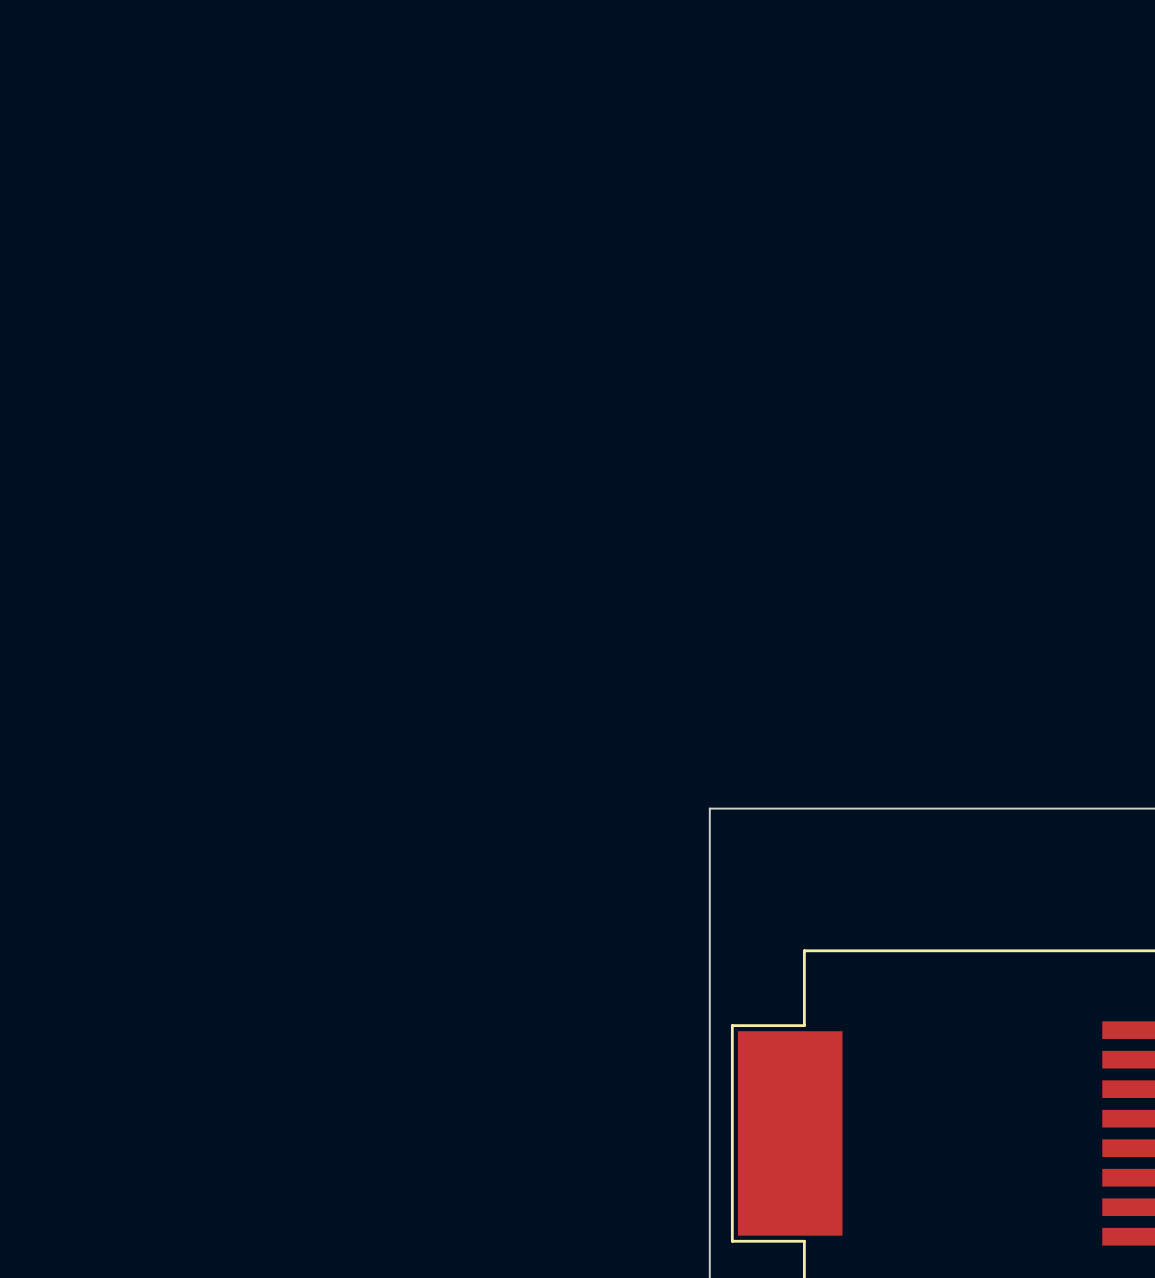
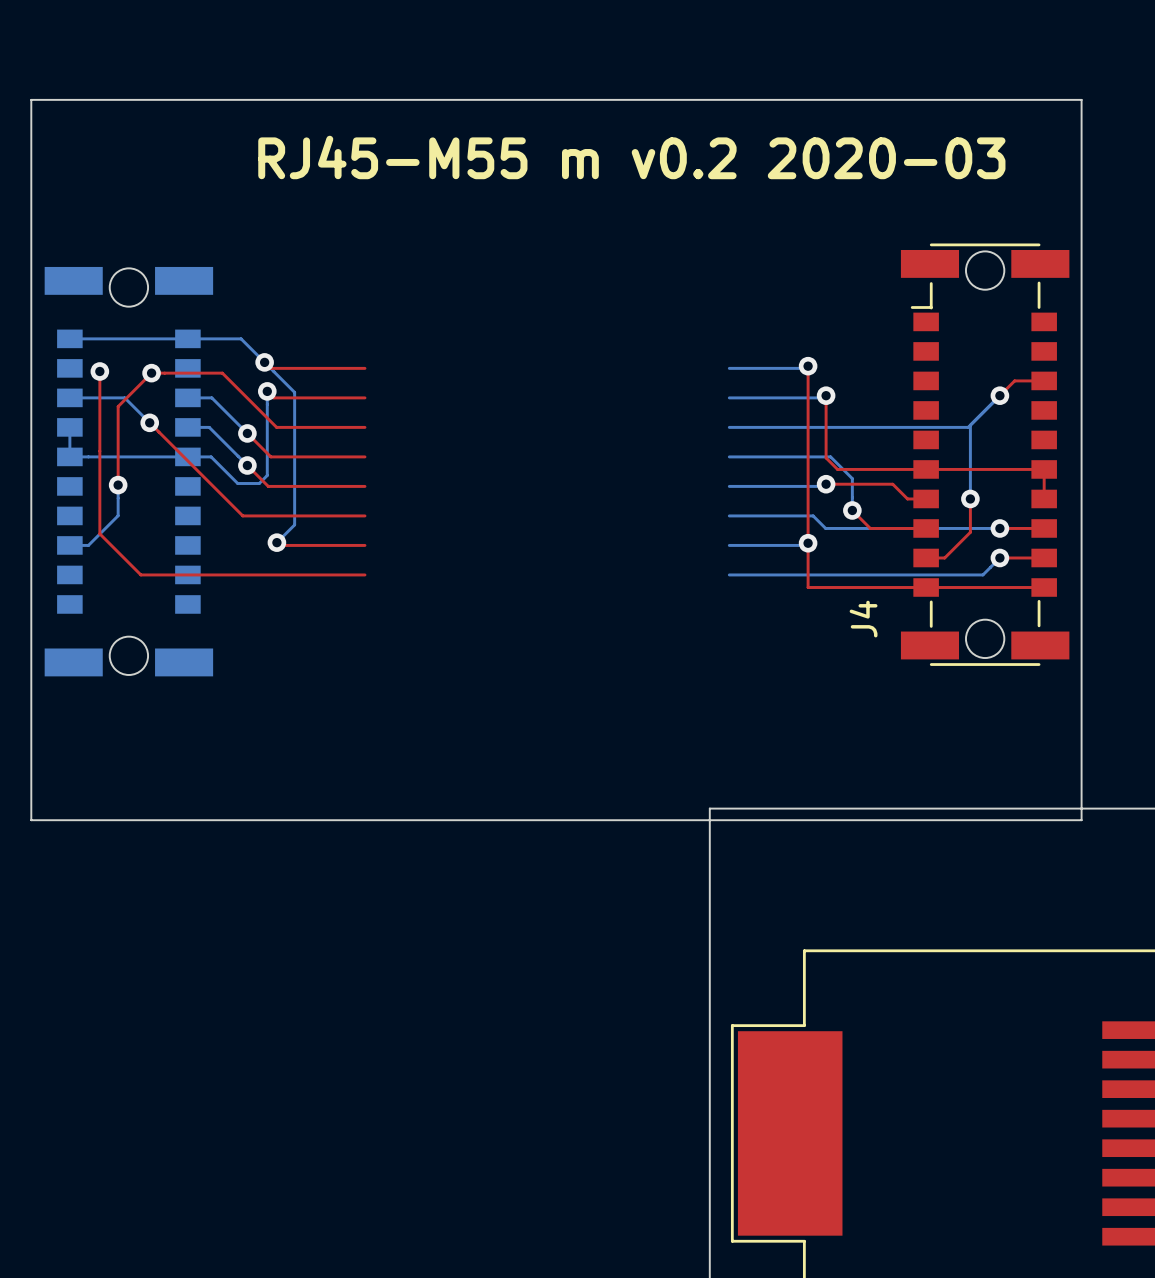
board edge: none -> (31, 99) (1081, 99) (1081, 820) (31, 820) (31, 99)
text: none -> RJ45-M55 m v0.2 2020-03 (631, 157)
bottom track: none -> (72, 336) (69, 338) (241, 338) (294, 392) (294, 524) (276, 542)
top track: none -> (264, 362) (270, 368) (364, 368)
via: none -> (264, 362)
bottom track: none -> (808, 366) (805, 368) (729, 368)
top track: none -> (808, 366) (808, 587) (1044, 587)
via: none -> (808, 366)
top track: none -> (99, 371) (99, 533) (140, 574) (364, 574)
via: none -> (99, 371)
via: none -> (151, 373)
top track: none -> (1044, 380) (1014, 380) (999, 395)
bottom track: none -> (267, 391) (267, 475) (259, 483) (237, 483) (211, 456) (69, 456) (69, 427)
top track: none -> (267, 391) (273, 397) (364, 397)
via: none -> (267, 391)
bottom track: none -> (826, 395) (823, 397) (729, 397)
top track: none -> (826, 395) (826, 457) (837, 469) (1044, 469) (1044, 498)
via: none -> (826, 395)
bottom track: none -> (999, 395) (968, 427) (729, 427)
via: none -> (999, 395)
bottom track: none -> (69, 397) (124, 397) (149, 422)
bottom track: none -> (187, 397) (211, 397) (247, 433)
top track: none -> (149, 422) (242, 515) (364, 515)
via: none -> (149, 422)
bottom track: none -> (970, 425) (970, 498)
top track: none -> (364, 427) (276, 427) (222, 373) (151, 373) (118, 406) (118, 485)
bottom track: none -> (190, 430) (187, 427) (209, 427) (247, 465)
top track: none -> (247, 433) (270, 456) (364, 456)
via: none -> (247, 433)
J4: none -> (985, 454)
bottom track: none -> (729, 456) (830, 456) (852, 478) (852, 510)
top track: none -> (247, 465) (268, 486) (364, 486)
via: none -> (247, 465)
part: none -> (128, 471)
bottom track: none -> (826, 484) (823, 486) (729, 486)
top track: none -> (826, 484) (892, 484) (907, 498) (926, 498)
via: none -> (826, 484)
bottom track: none -> (118, 485) (118, 515) (88, 545) (69, 545)
via: none -> (118, 485)
top track: none -> (970, 498) (970, 532) (944, 557) (926, 557)
via: none -> (970, 498)
top track: none -> (852, 510) (870, 528) (926, 528)
via: none -> (852, 510)
bottom track: none -> (729, 515) (813, 515) (825, 528) (999, 528)
top track: none -> (999, 528) (1044, 528)
via: none -> (999, 528)
top track: none -> (276, 542) (279, 545) (364, 545)
via: none -> (276, 542)
bottom track: none -> (808, 543) (805, 545) (729, 545)
via: none -> (808, 543)
bottom track: none -> (999, 557) (982, 574) (729, 574)
top track: none -> (999, 557) (1044, 557)
via: none -> (999, 557)

